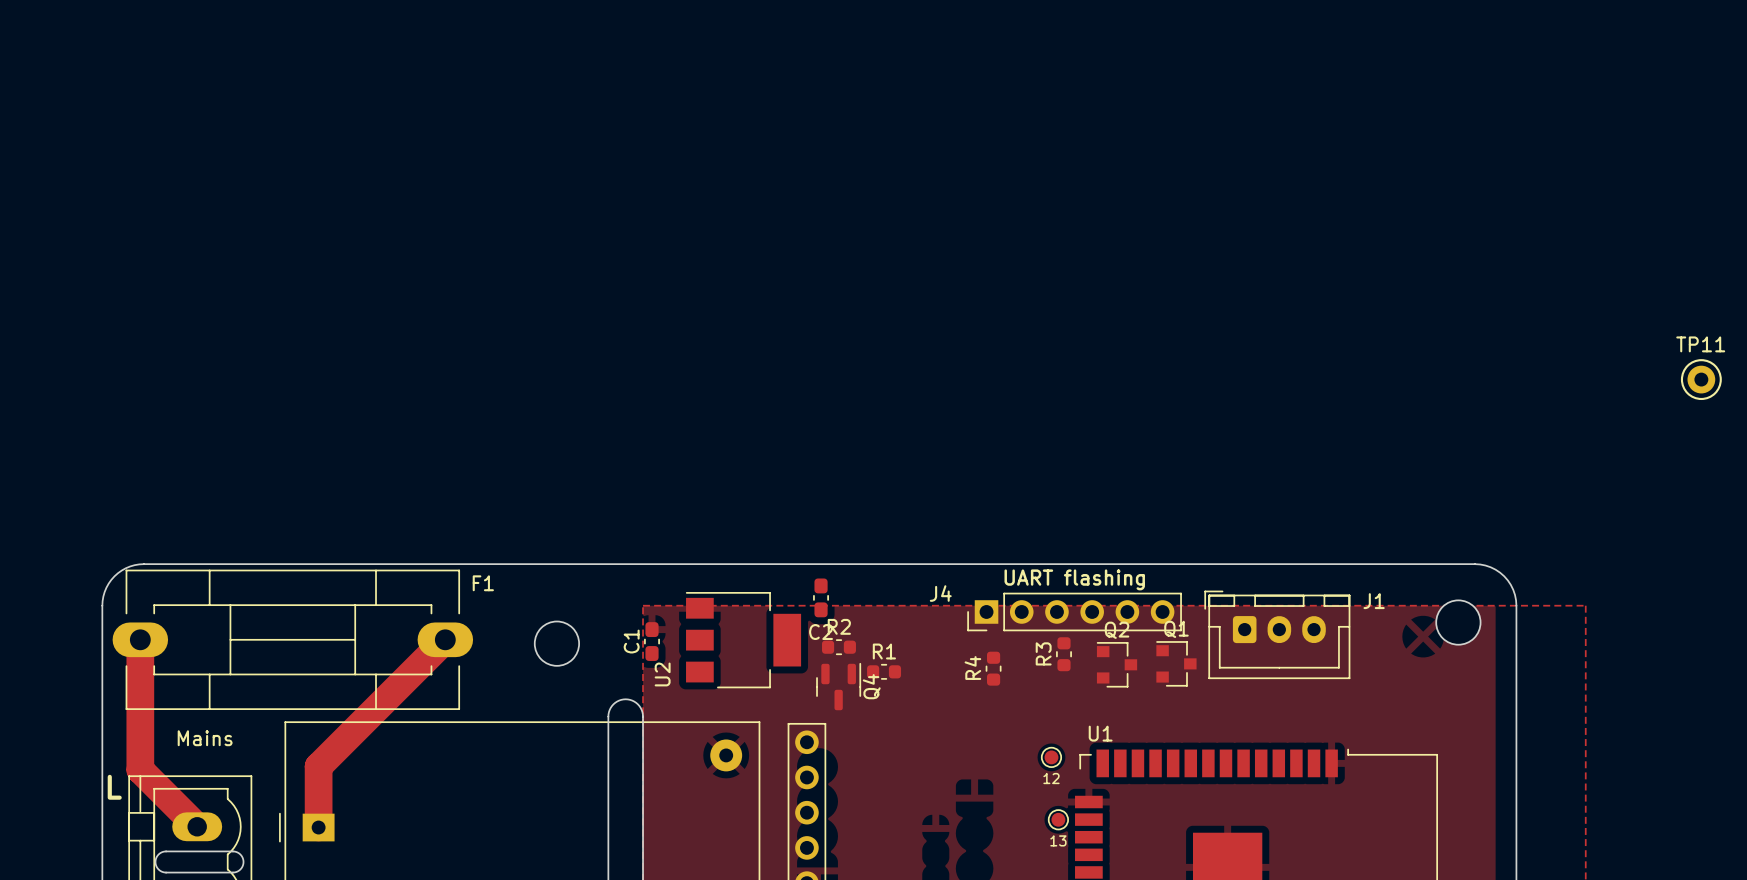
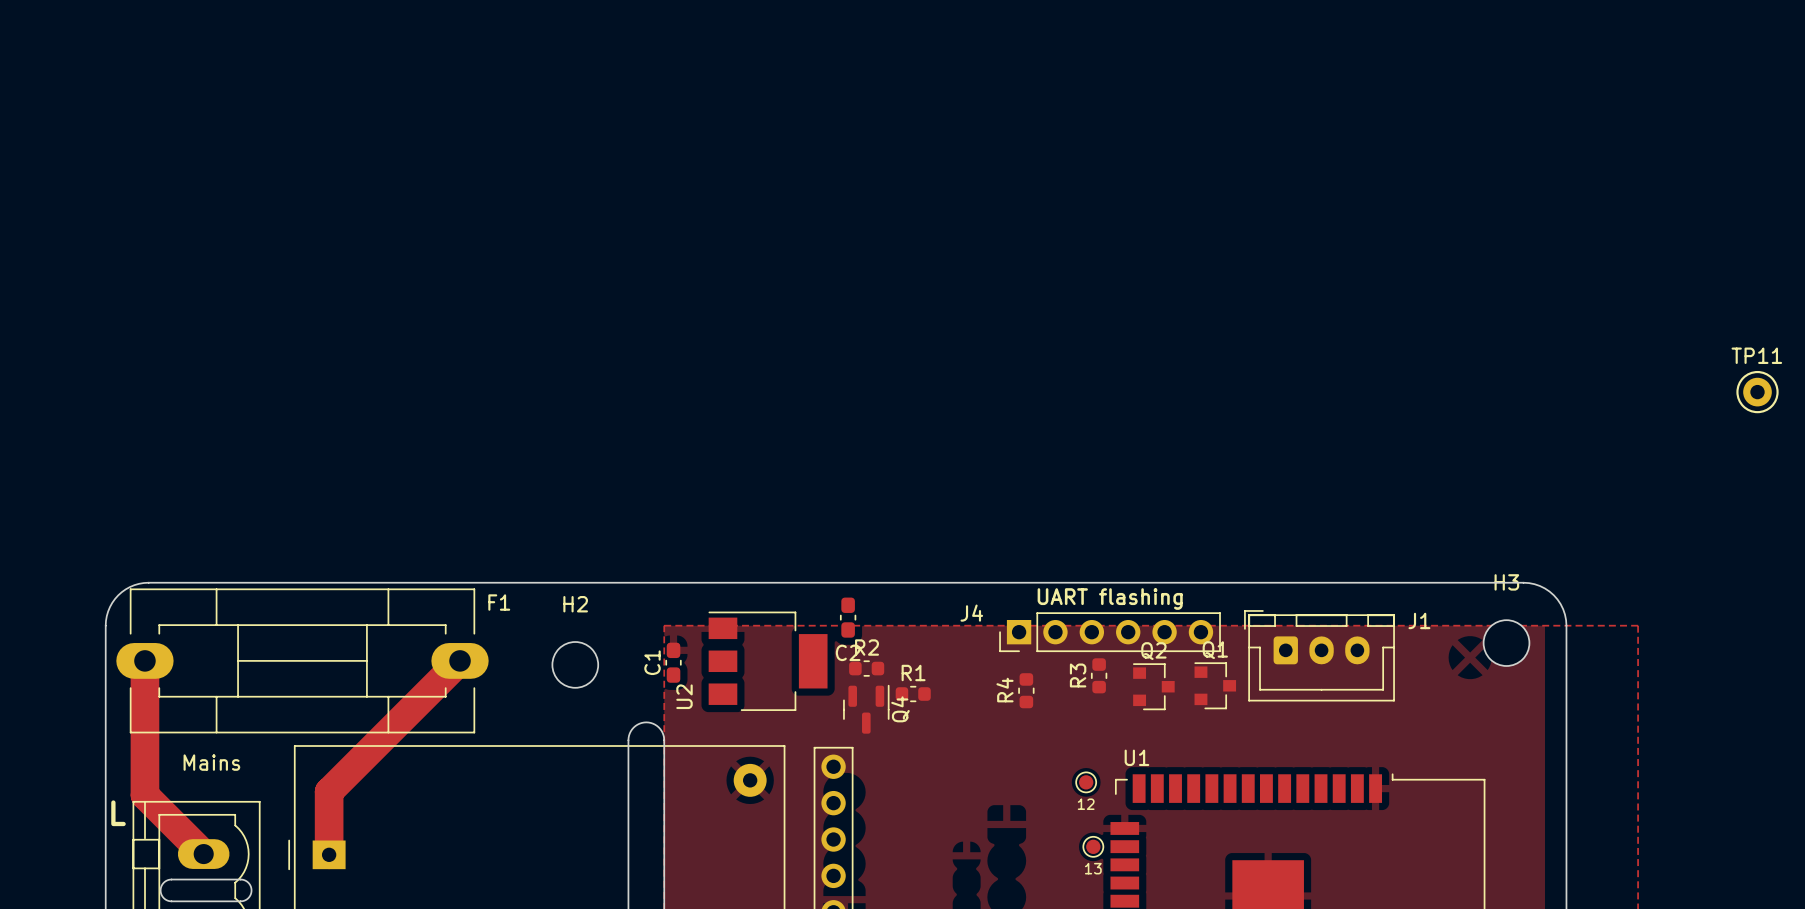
H3 name: none -> H3 (1506, 582)
H2 name: none -> H2 (575, 604)

